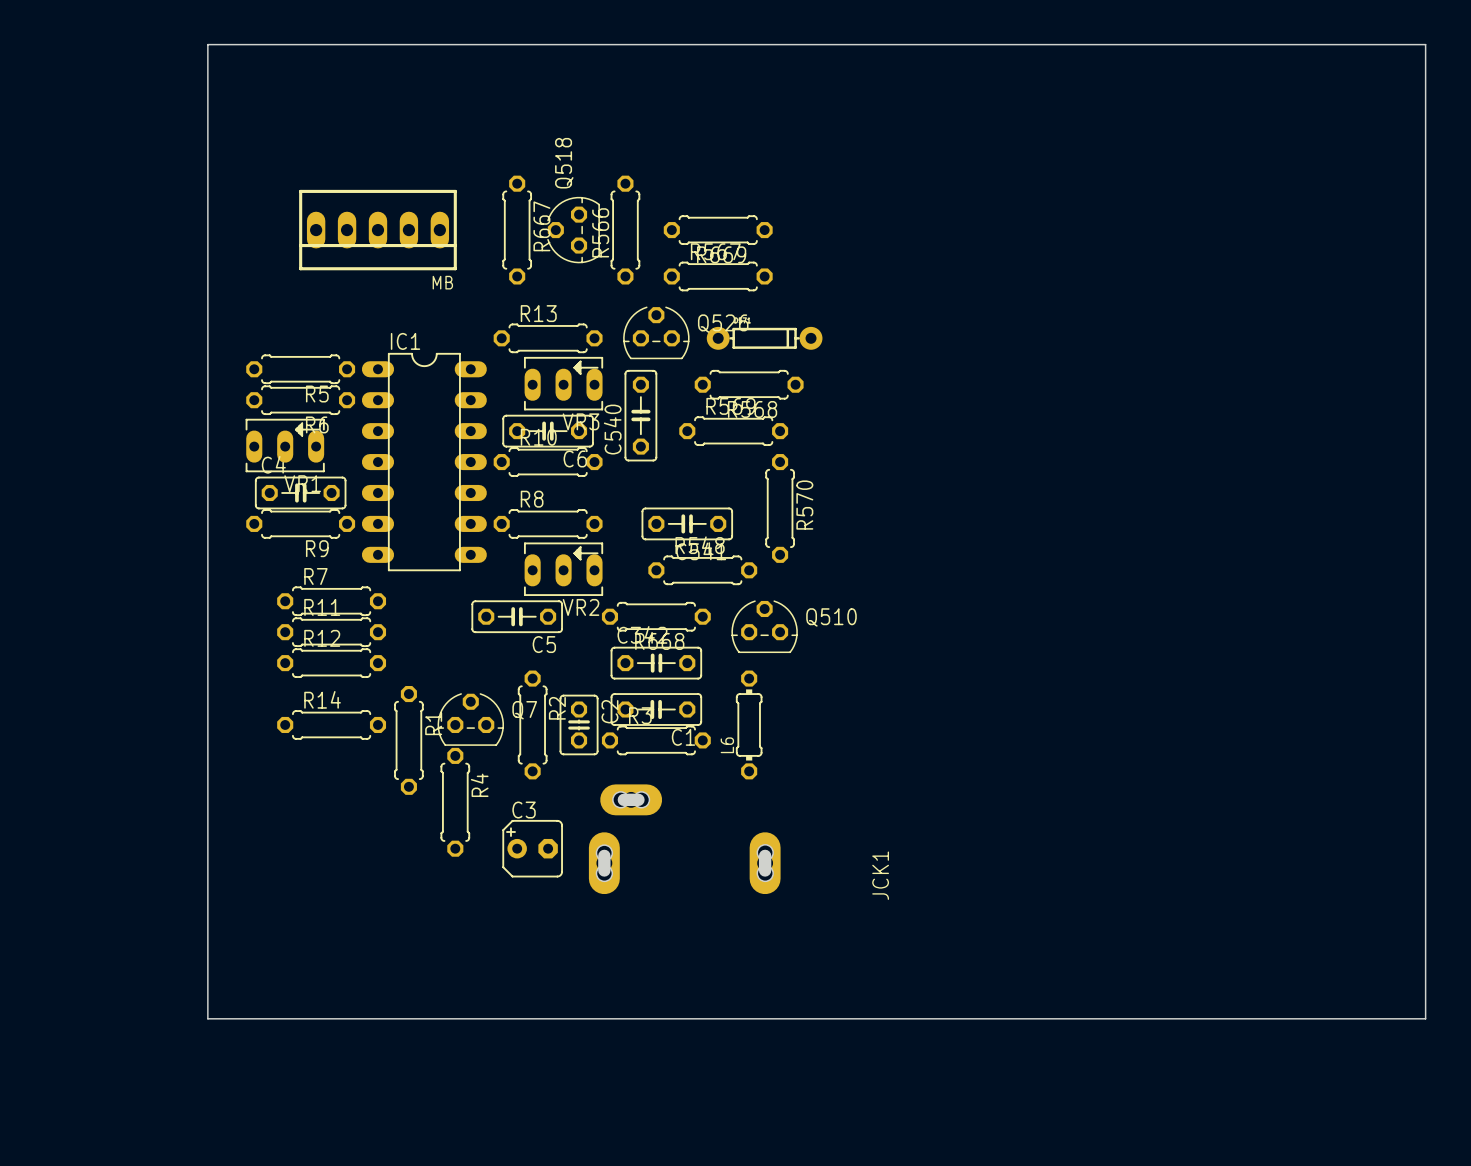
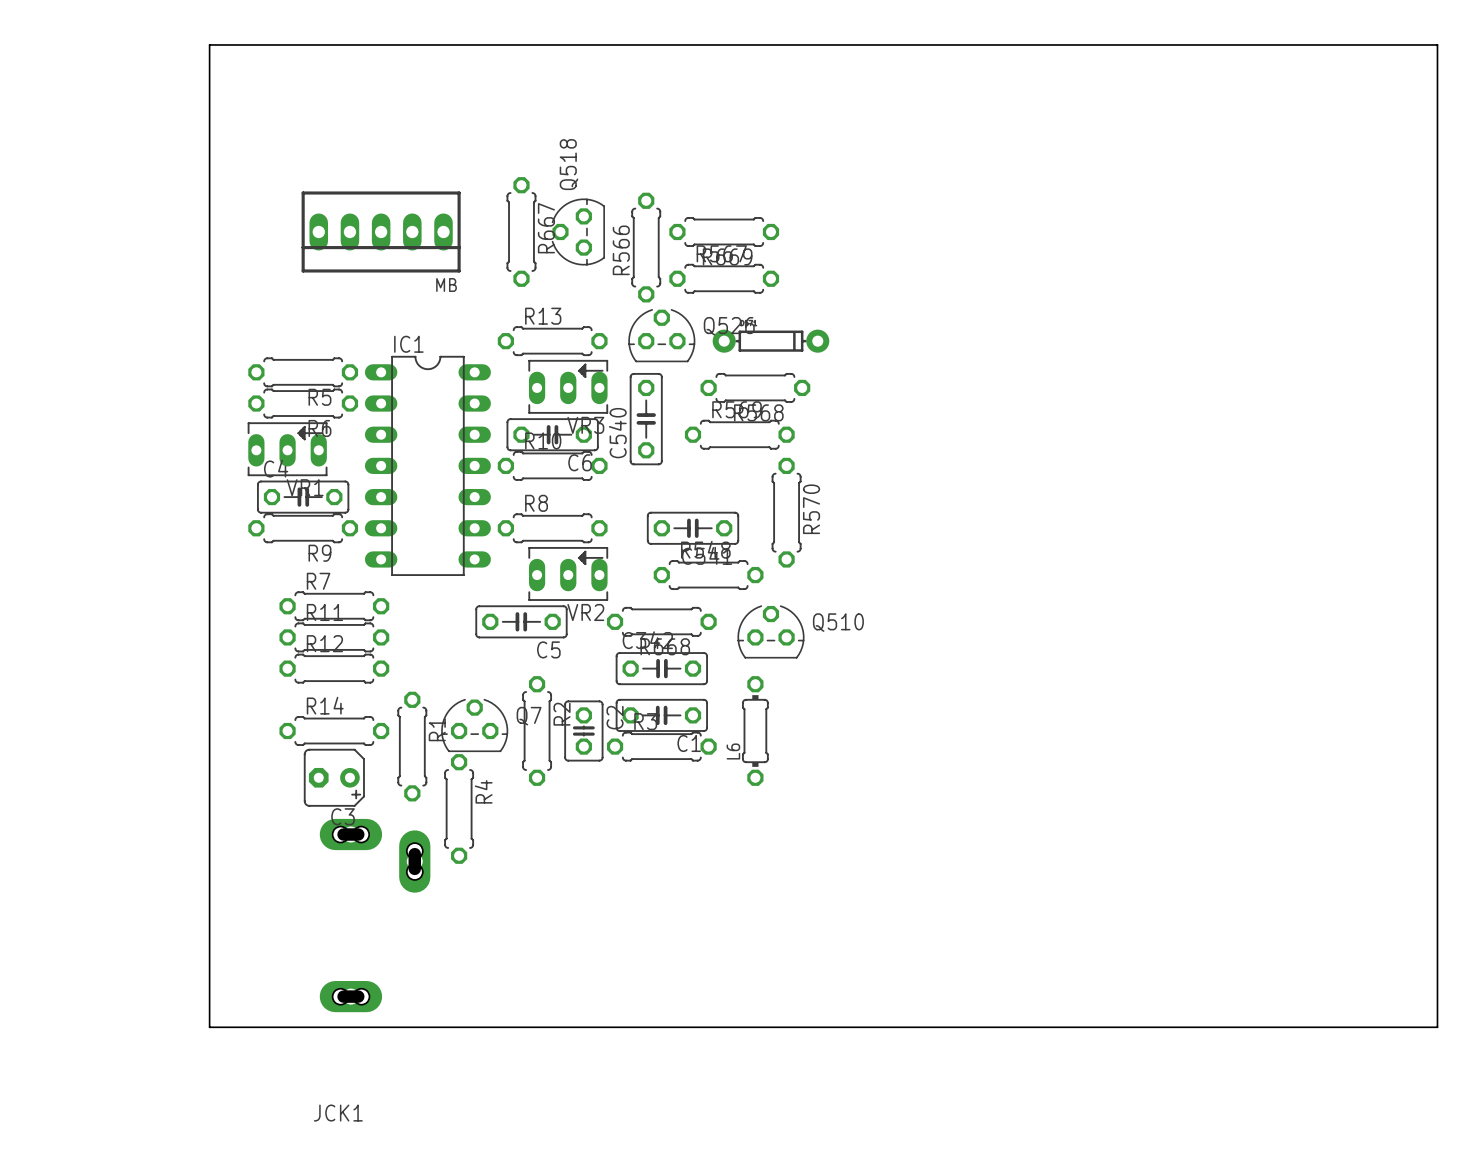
R566 position: (625, 230) -> (646, 247)
JCK1 rotation: 0° (684, 839) -> 90° clockwise (375, 915)
JCK1 position: (684, 839) -> (375, 915)
C3 rotation: 0° (532, 848) -> 180° (334, 777)
C3 position: (532, 848) -> (334, 777)

